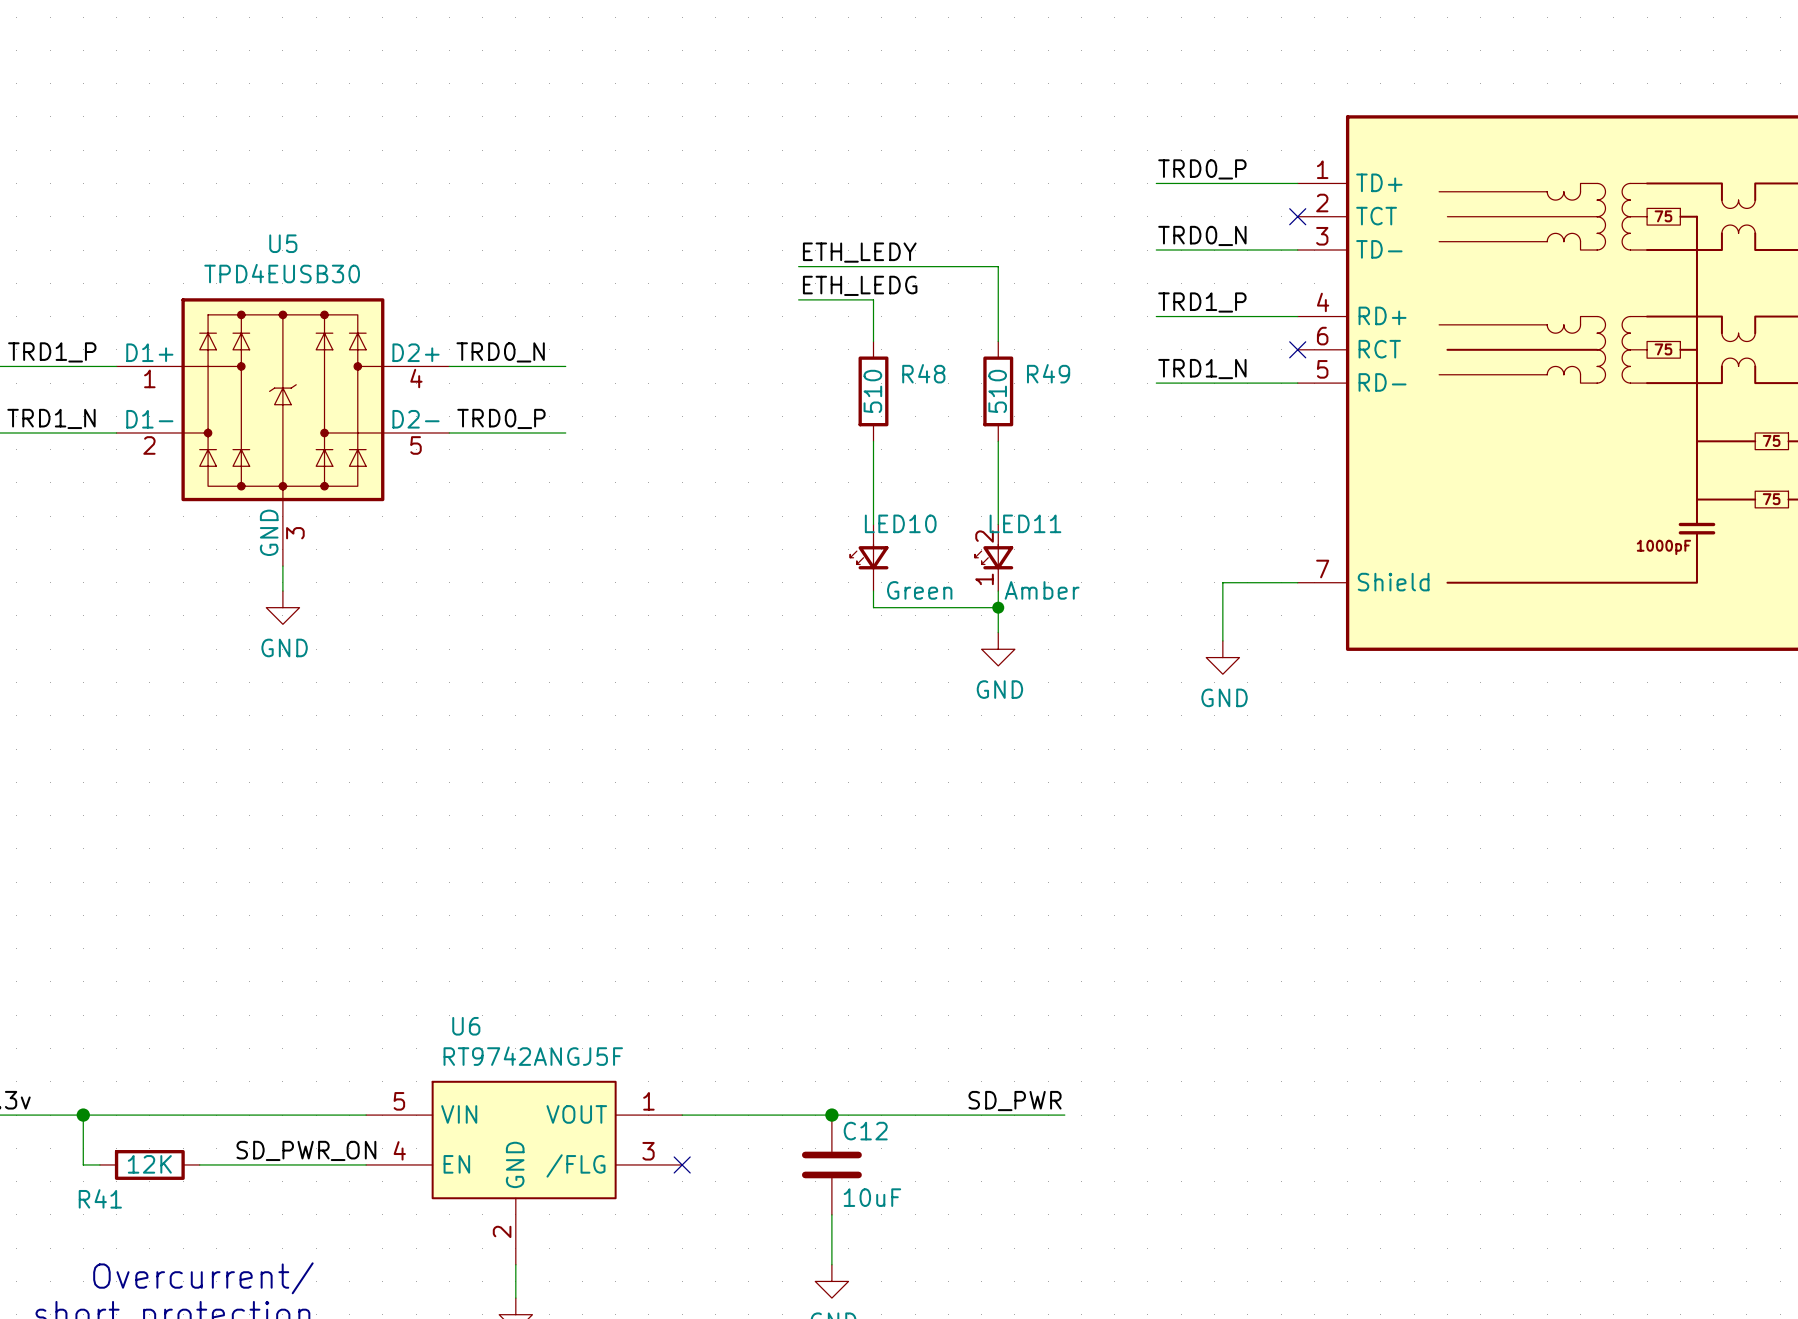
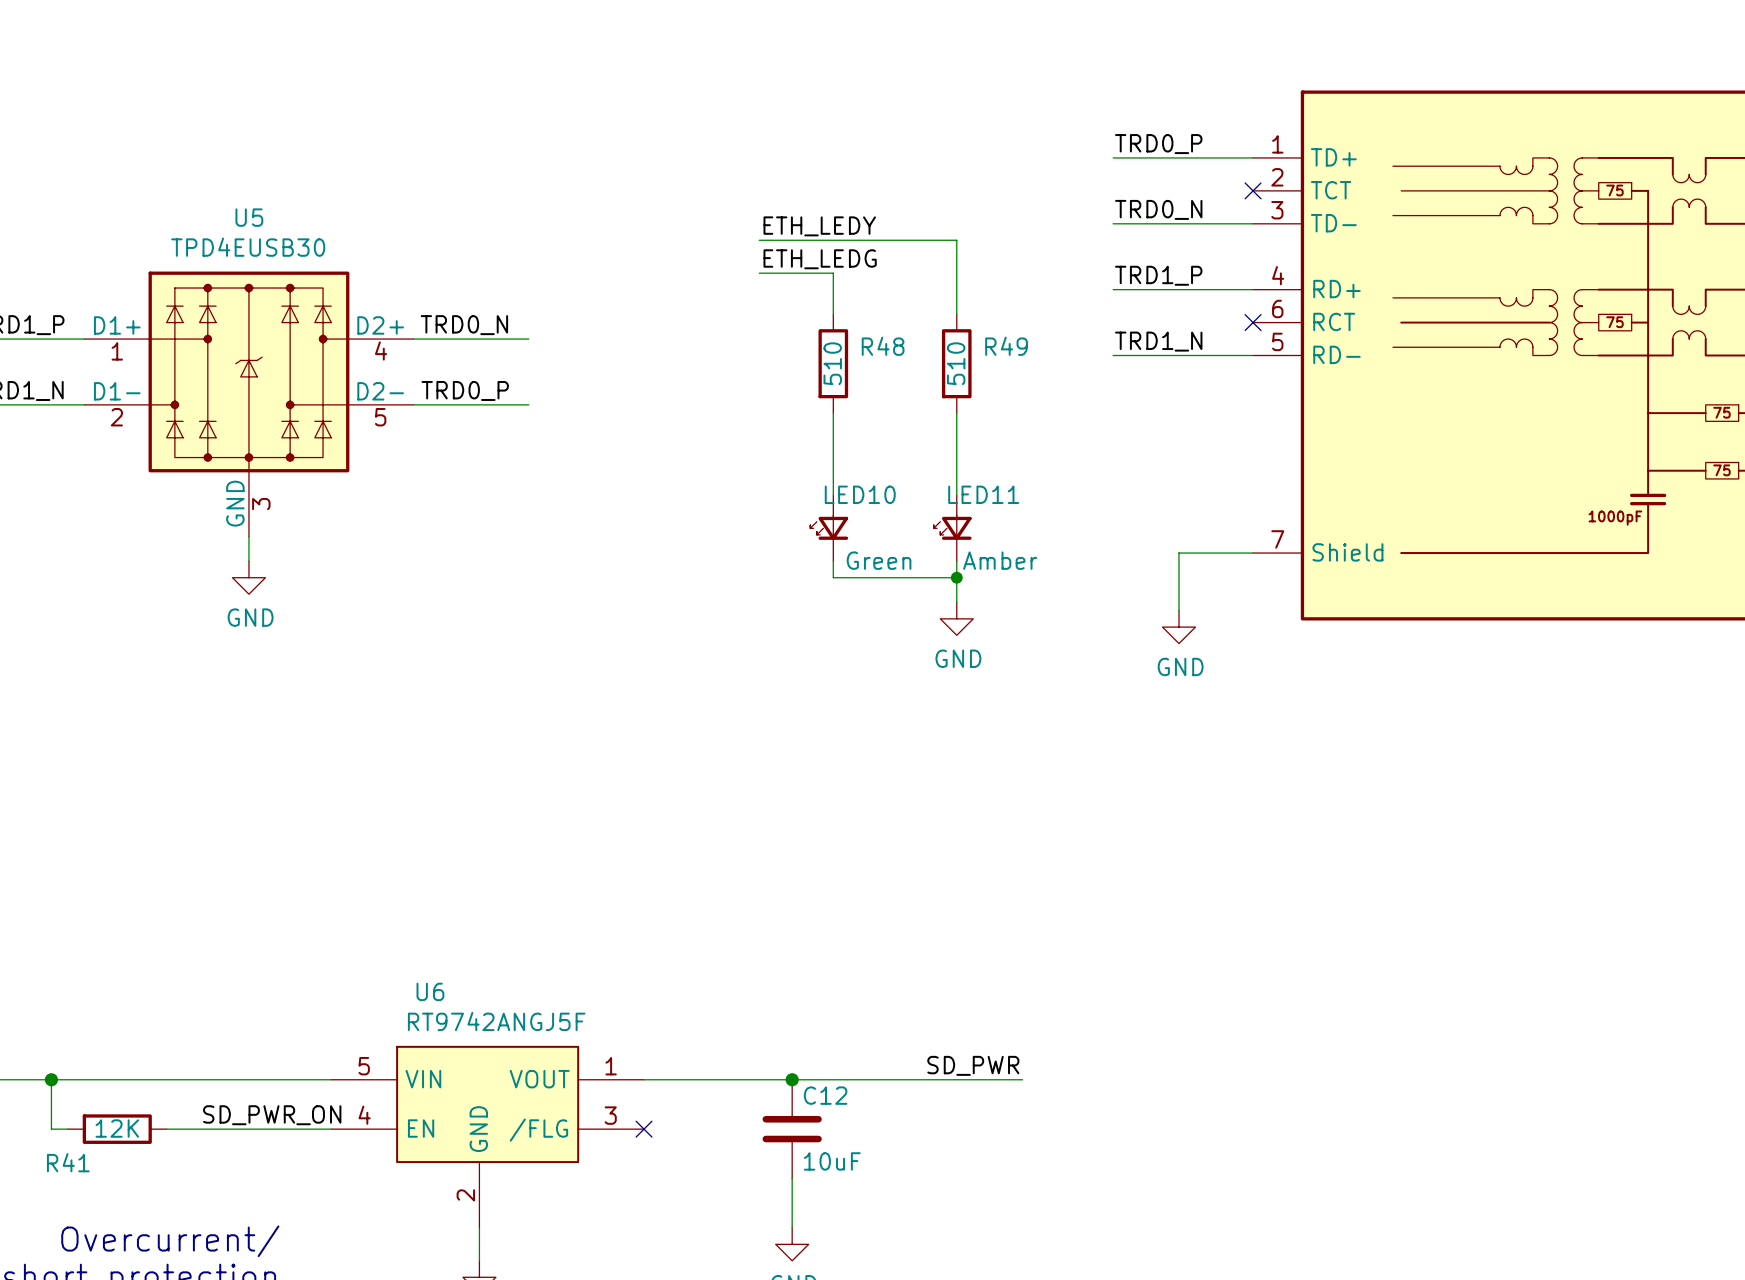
LED11 pin number: 2 (984, 536) -> none
LED11 pin number: 1 (984, 579) -> none

